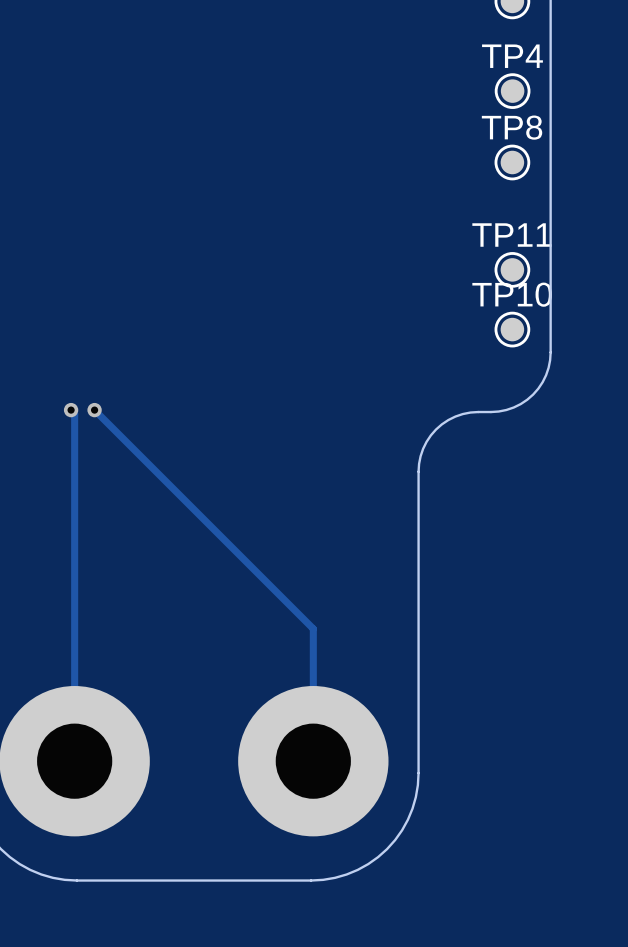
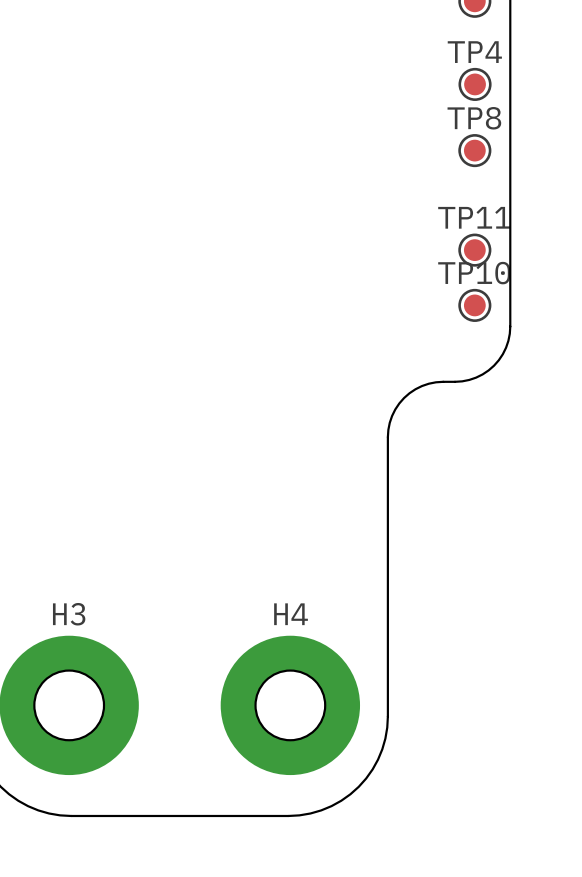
track: (71, 410) (74, 413) (74, 761) -> none
via: (71, 410) -> none
track: (94, 410) (313, 628) (313, 761) -> none
via: (94, 410) -> none
H3 name: none -> H3 (69, 614)
H4 name: none -> H4 (291, 614)
round board edge: none -> [33, 669, 106, 742]
round board edge: none -> [254, 669, 327, 742]

